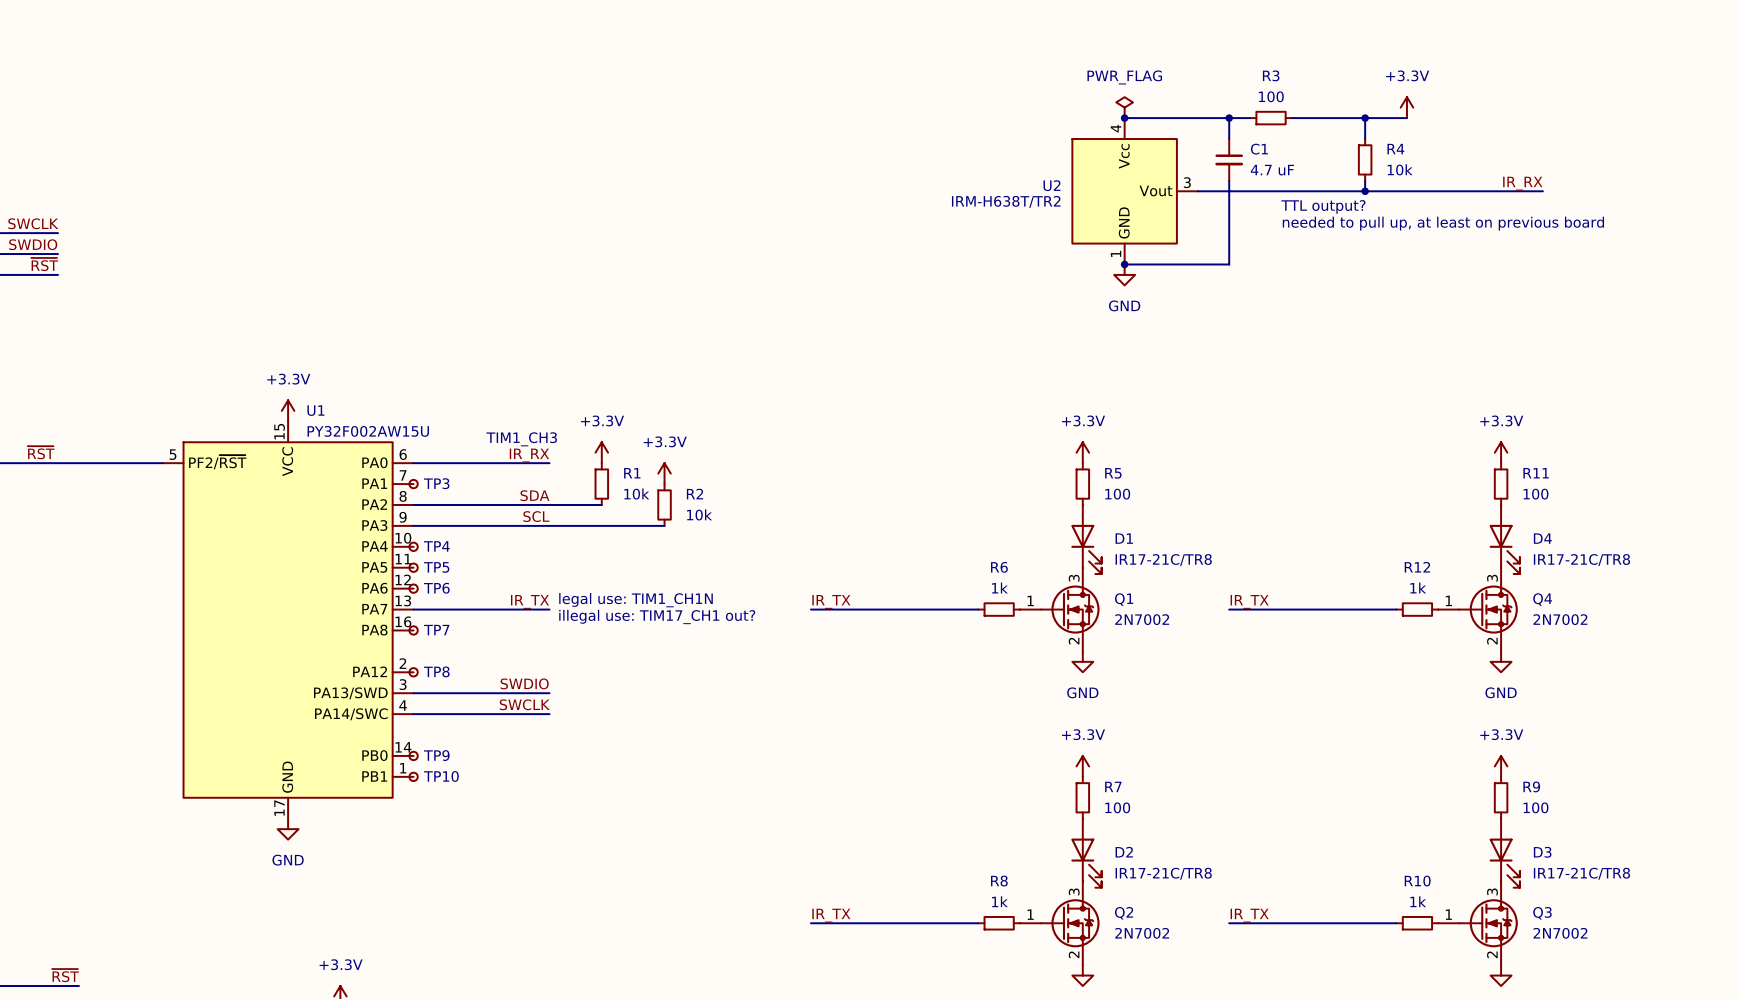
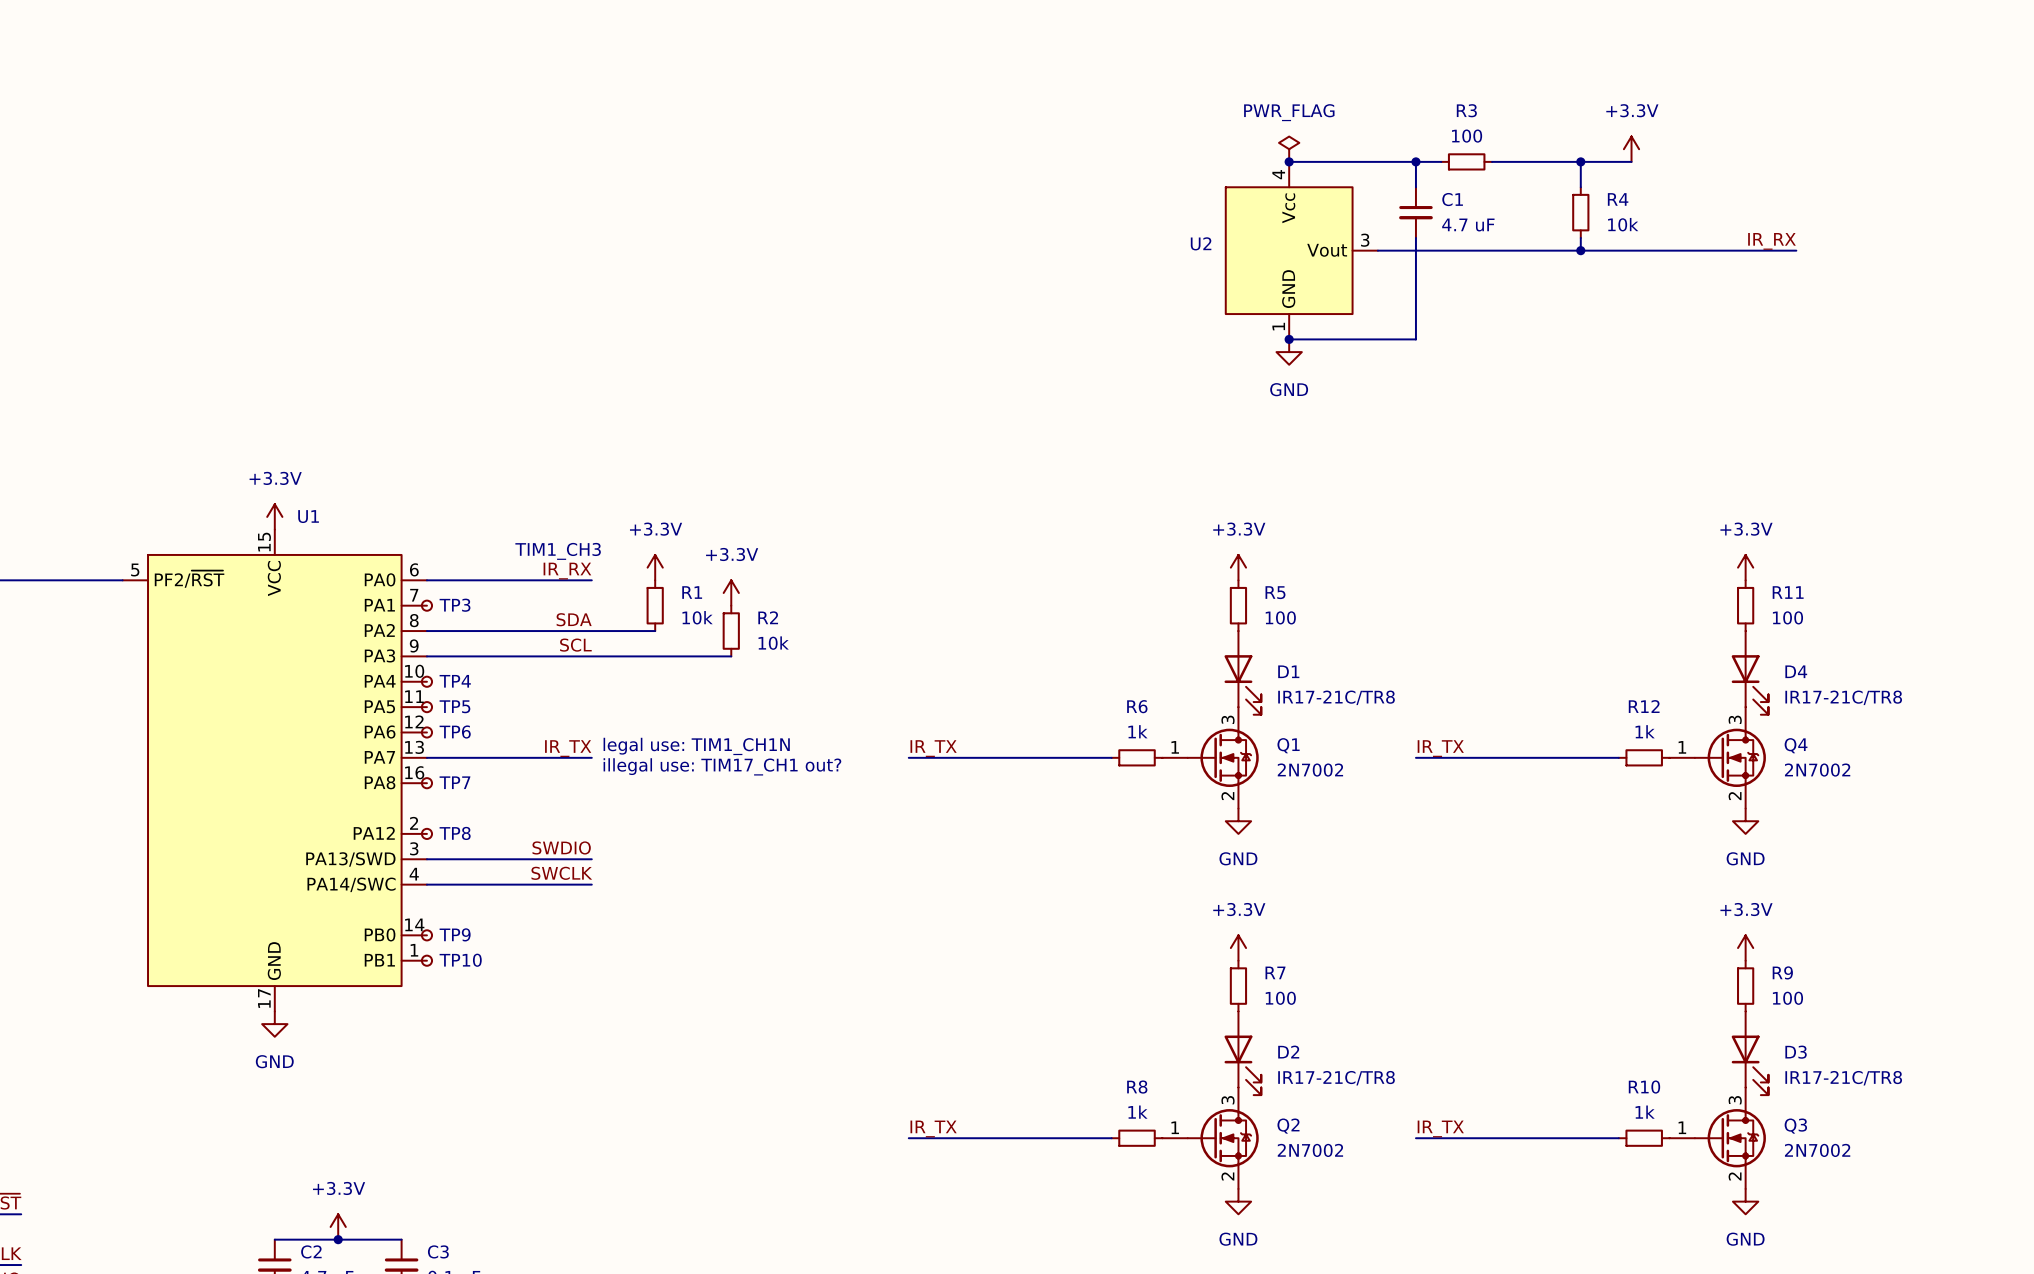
U2 value: IRM-H638T/TR2 (1006, 201) -> none
text: TTL output? (1323, 206) -> none
text: needed to pull up, at least on previous board (1443, 223) -> none
U1 value: PY32F002AW15U (368, 431) -> none

